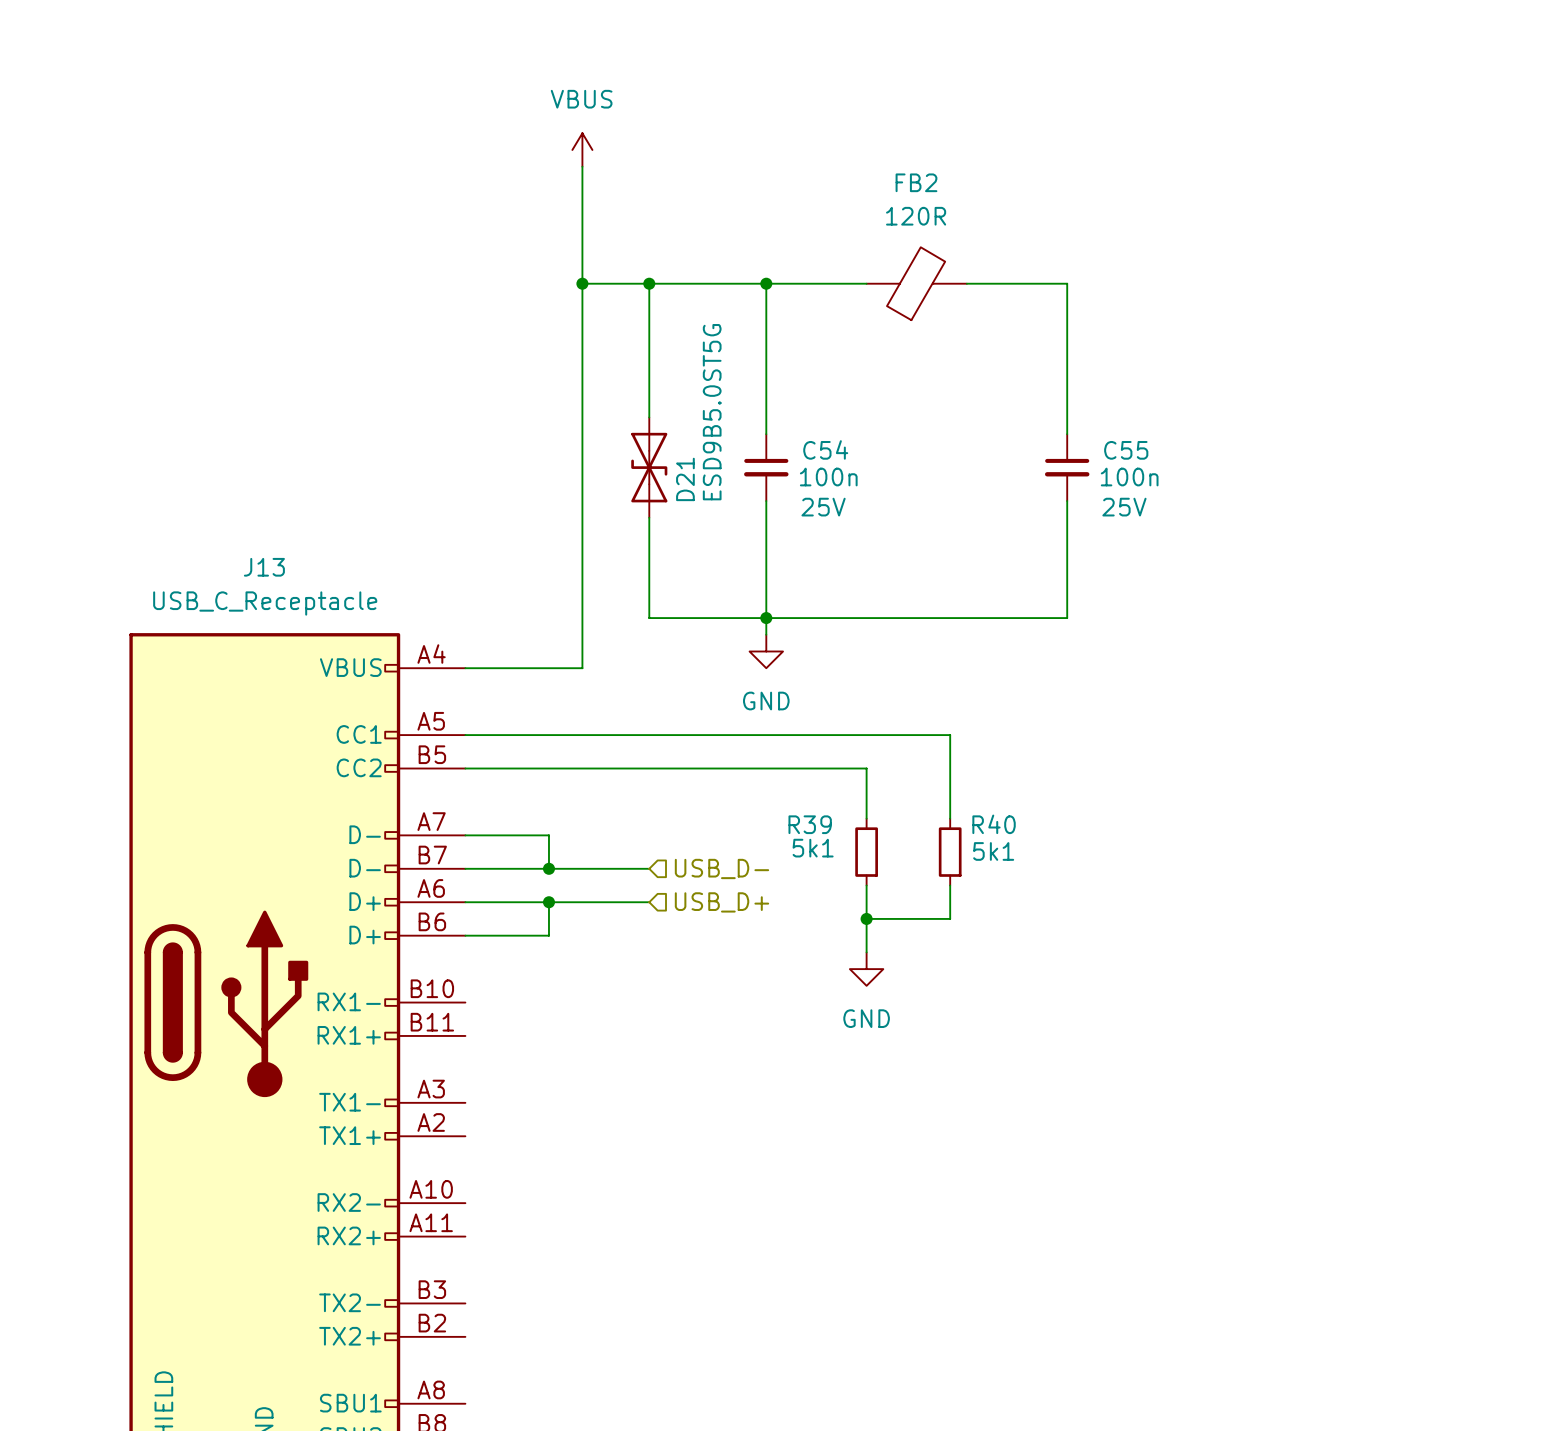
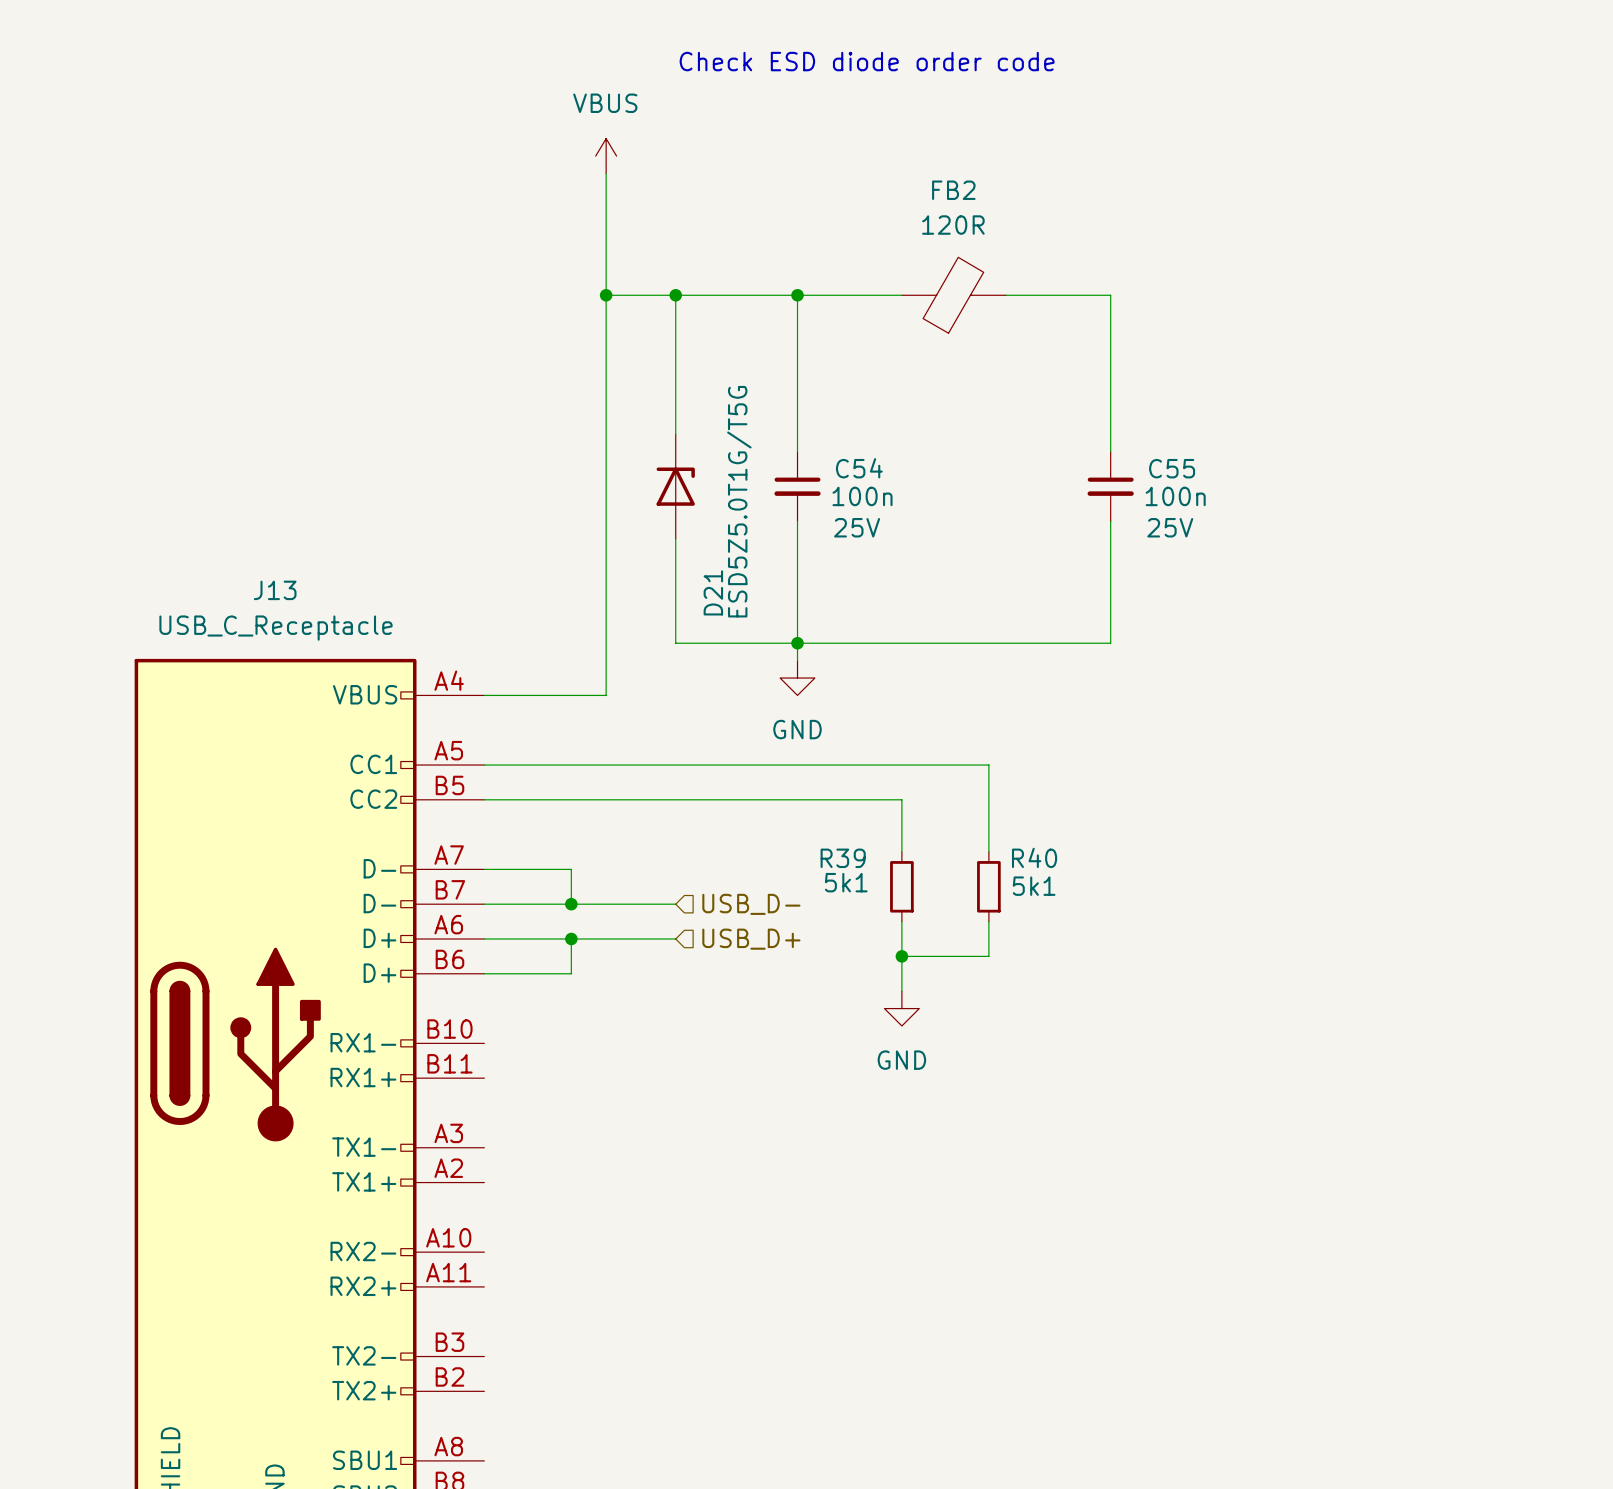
text: none -> Check ESD diode order code (867, 61)
D21 value: ESD9B5.0ST5G (712, 412) -> ESD5Z5.0T1G/T5G (739, 501)
D21 symbol: [631, 417, 668, 518] -> [656, 434, 695, 539]
D21 name position: D21 (685, 479) -> D21 (713, 592)

